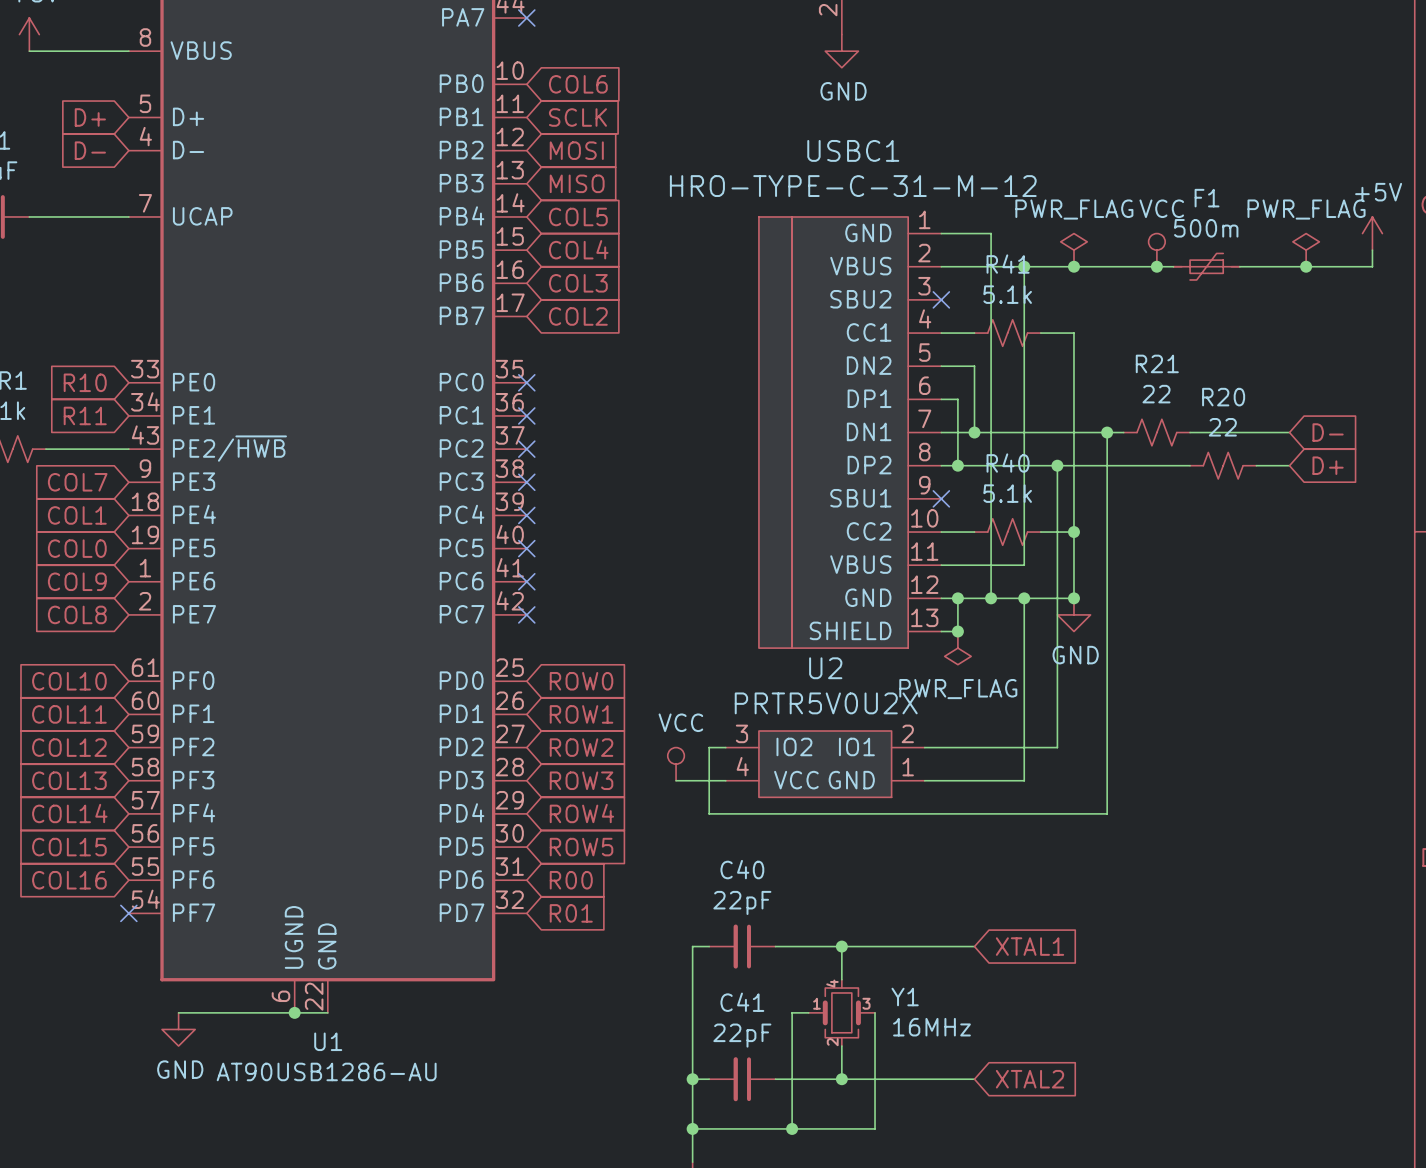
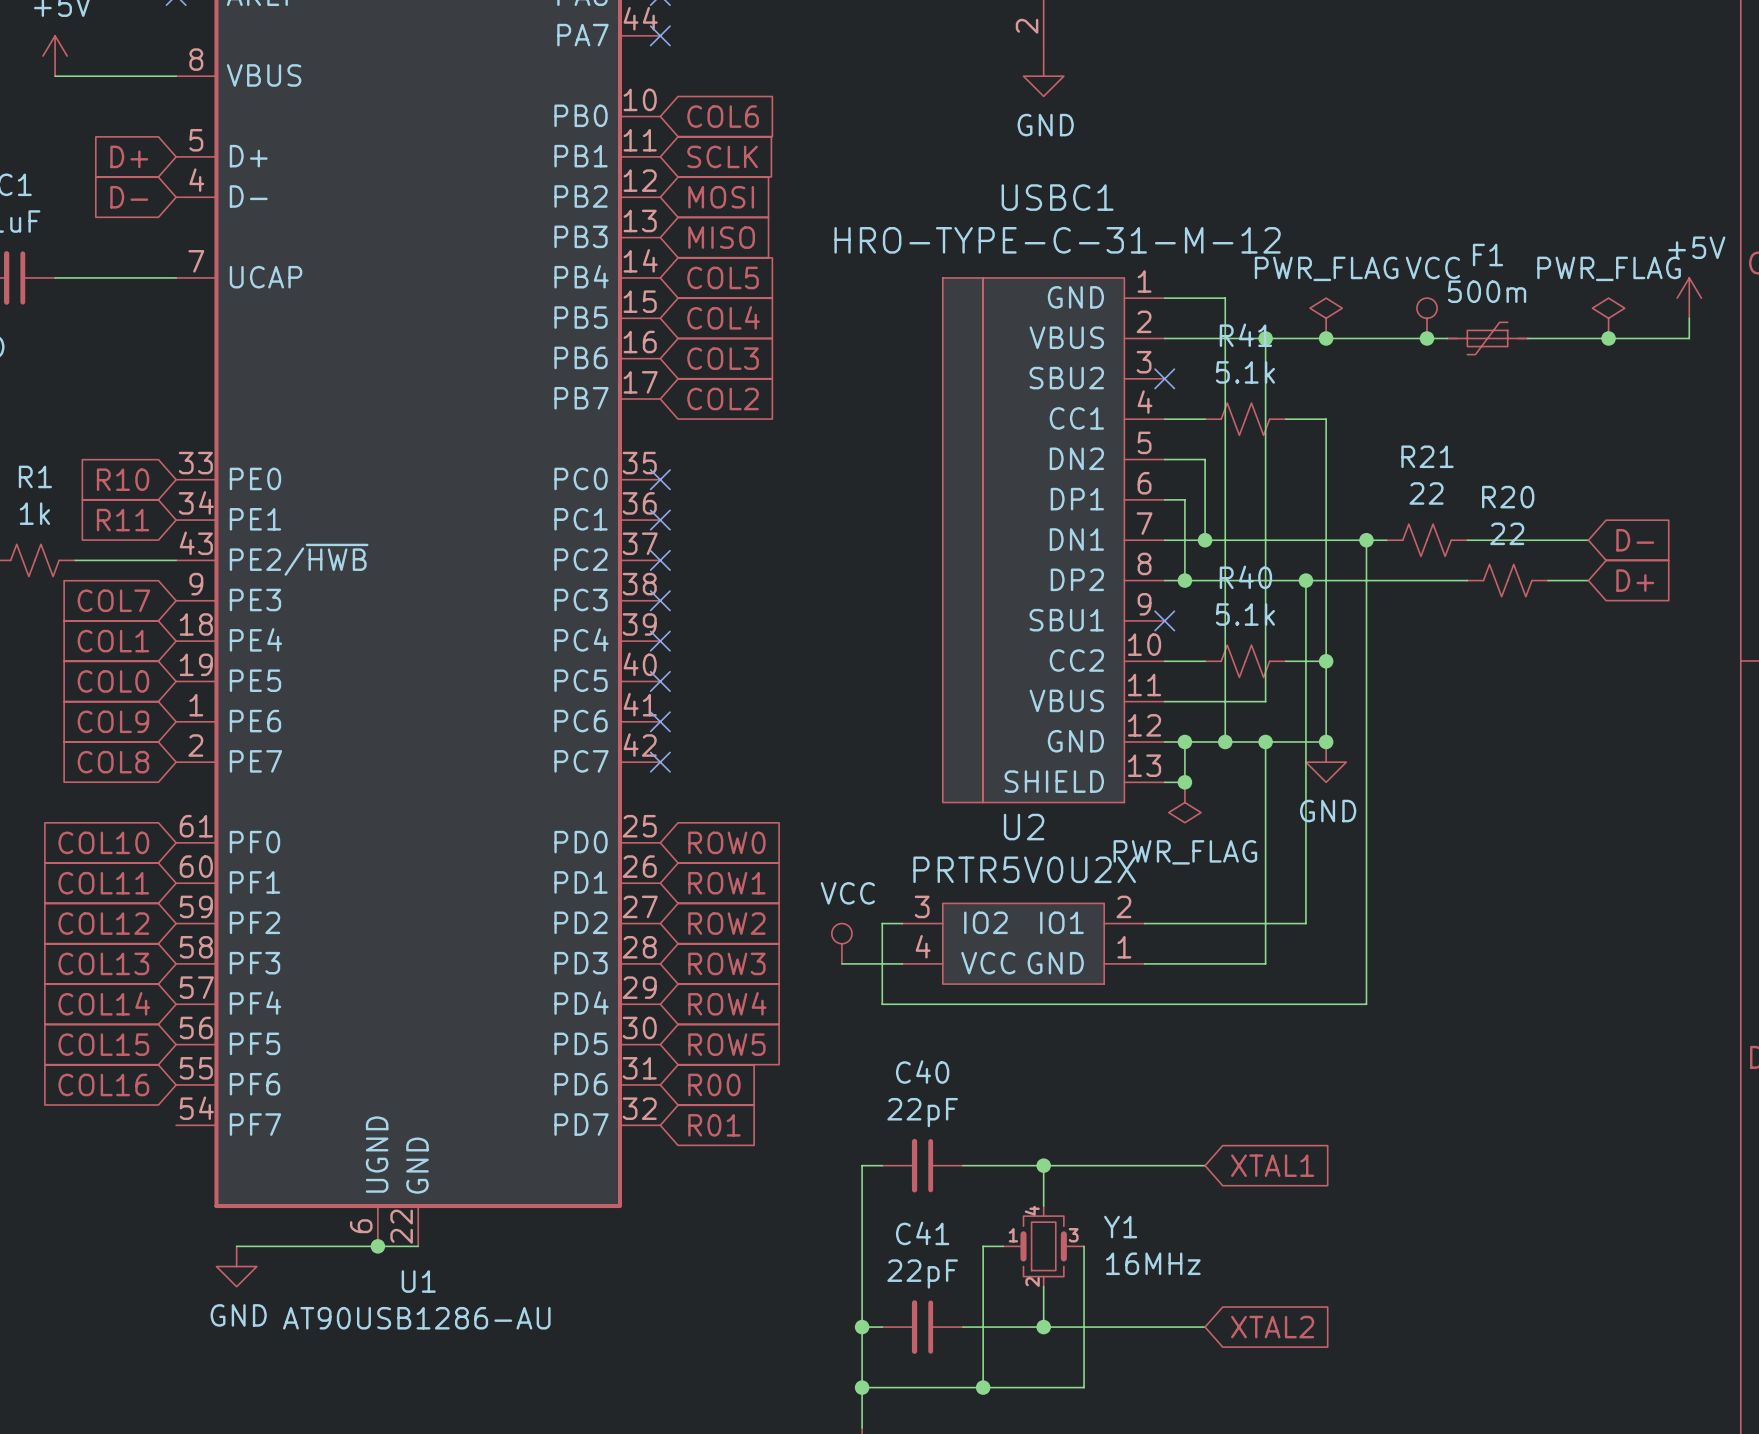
no-connect mark: (128, 913) -> none

